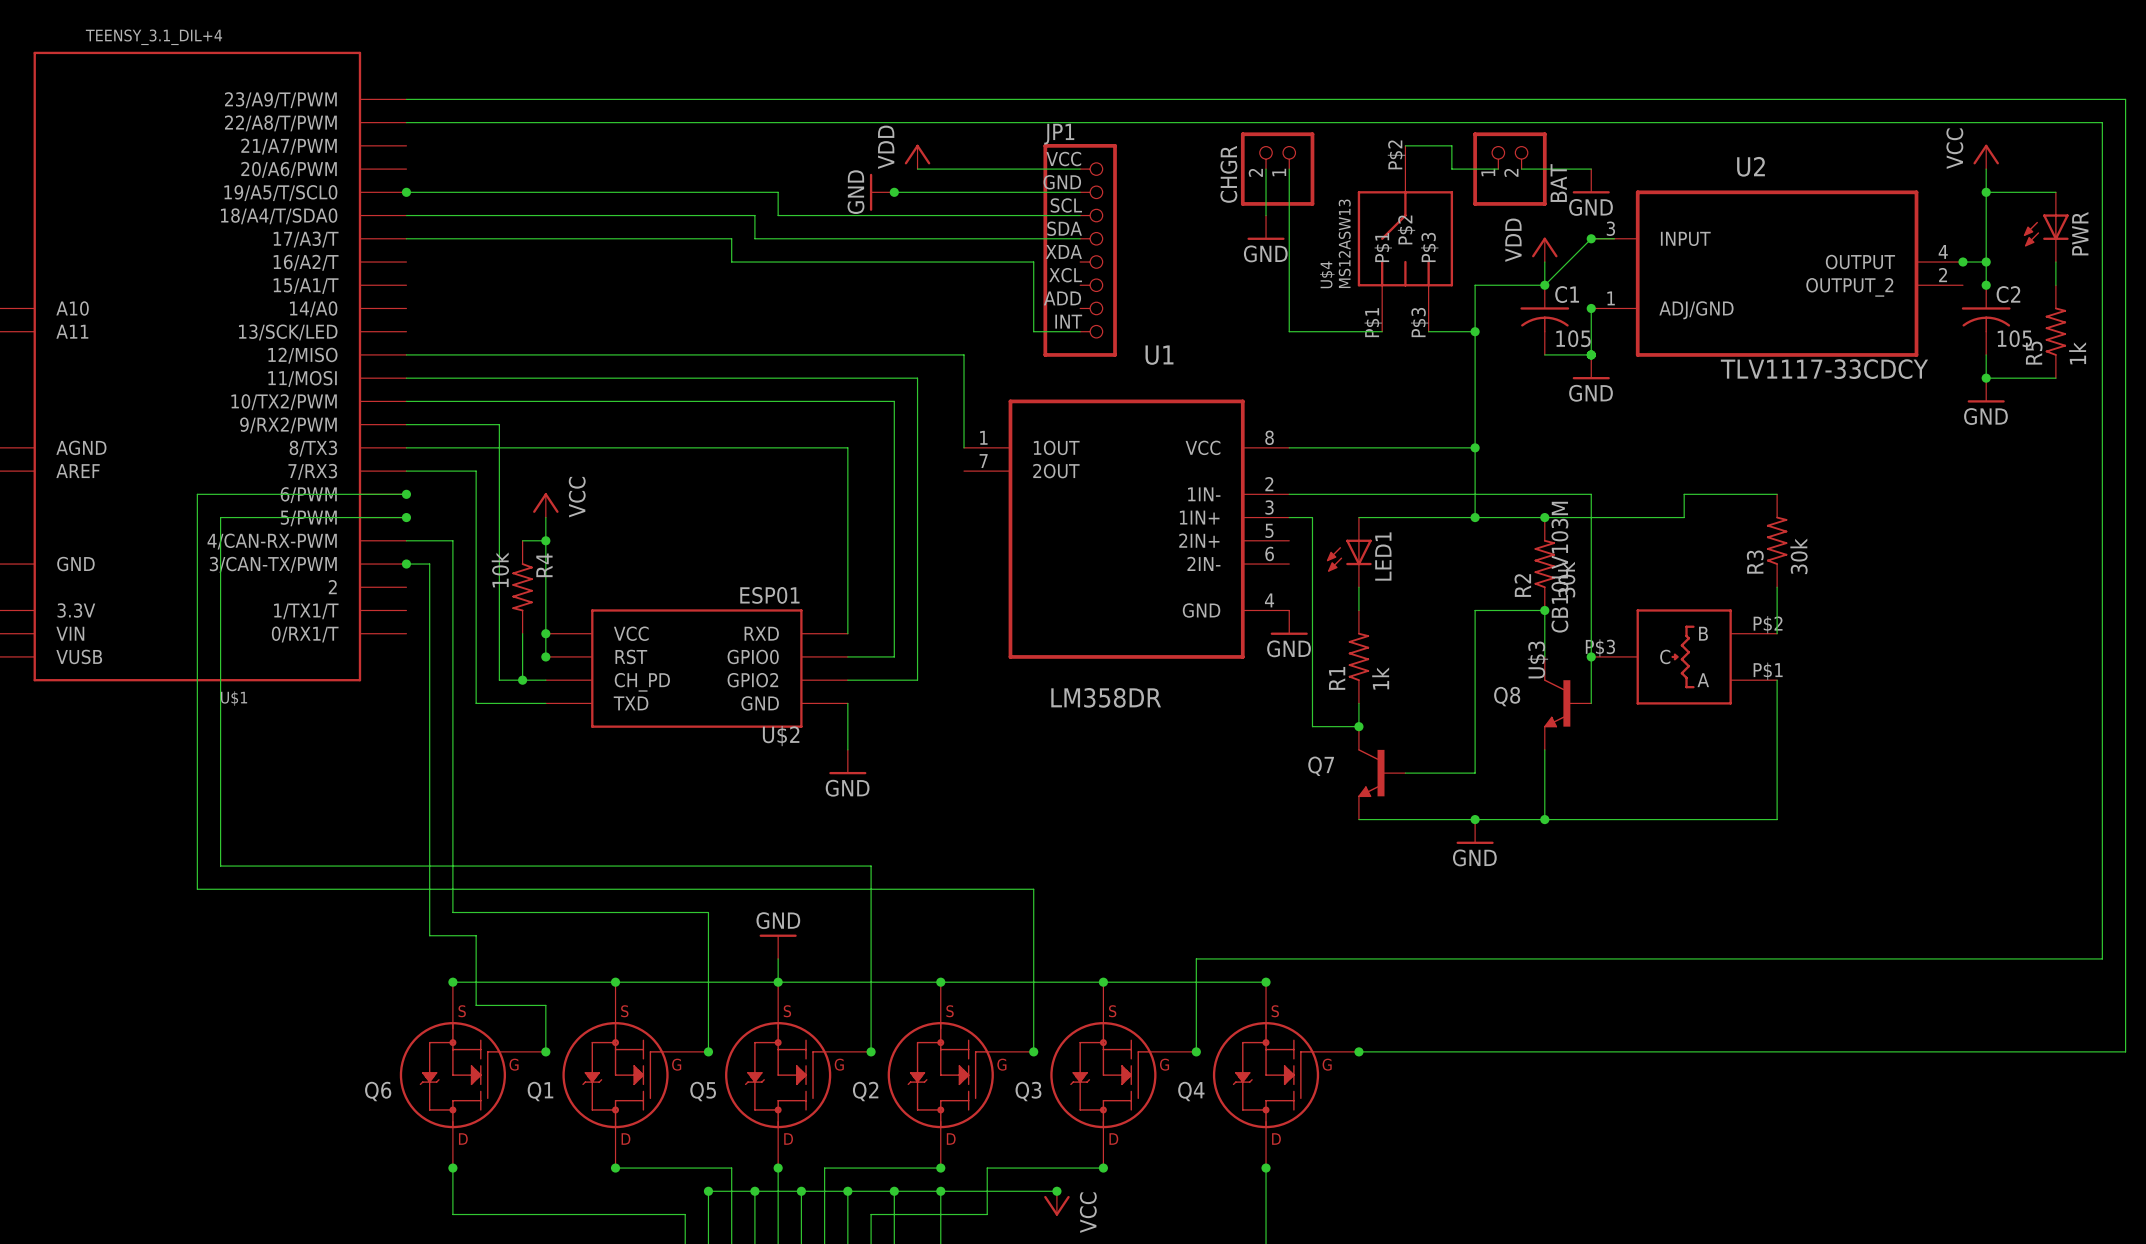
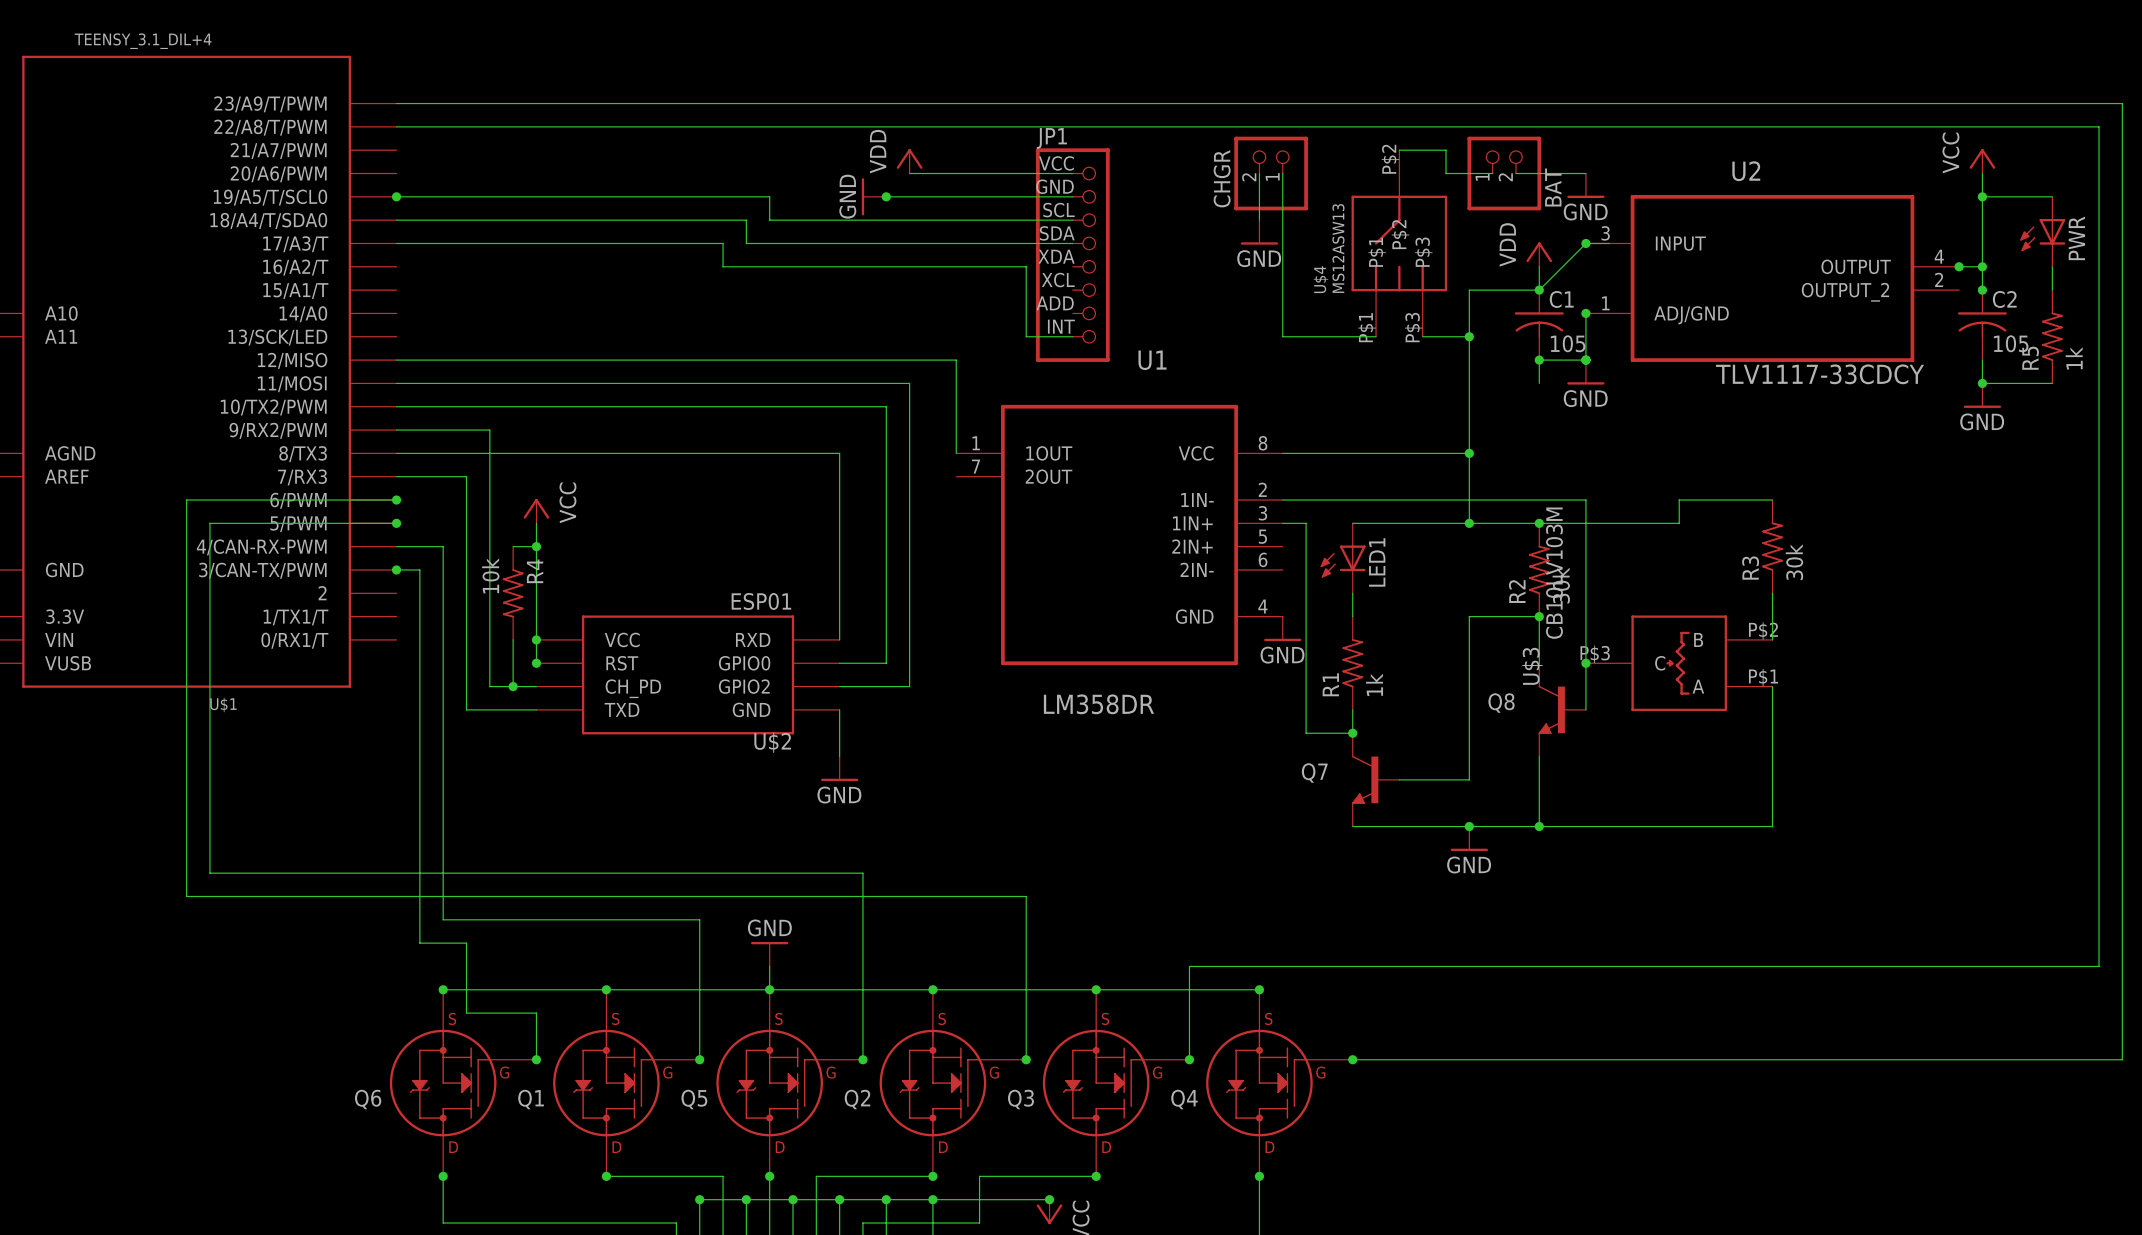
wire: none -> (1539, 360) (1539, 383)
junction: none -> (1539, 360)

